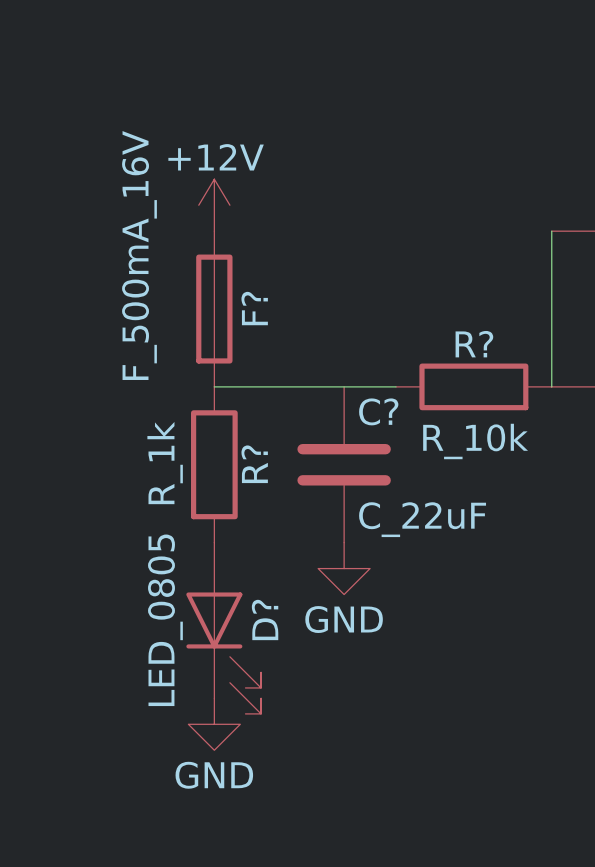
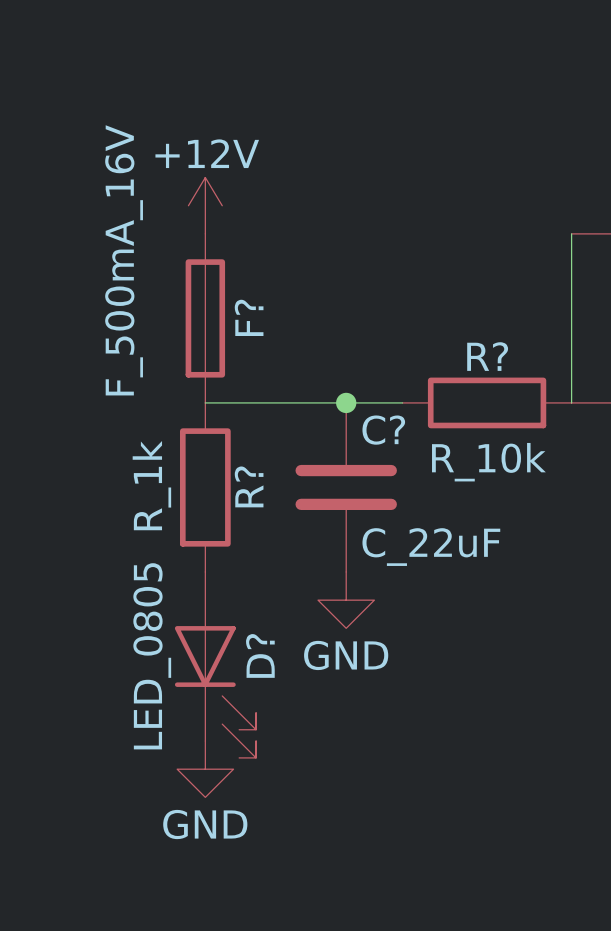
junction: none -> (346, 402)

